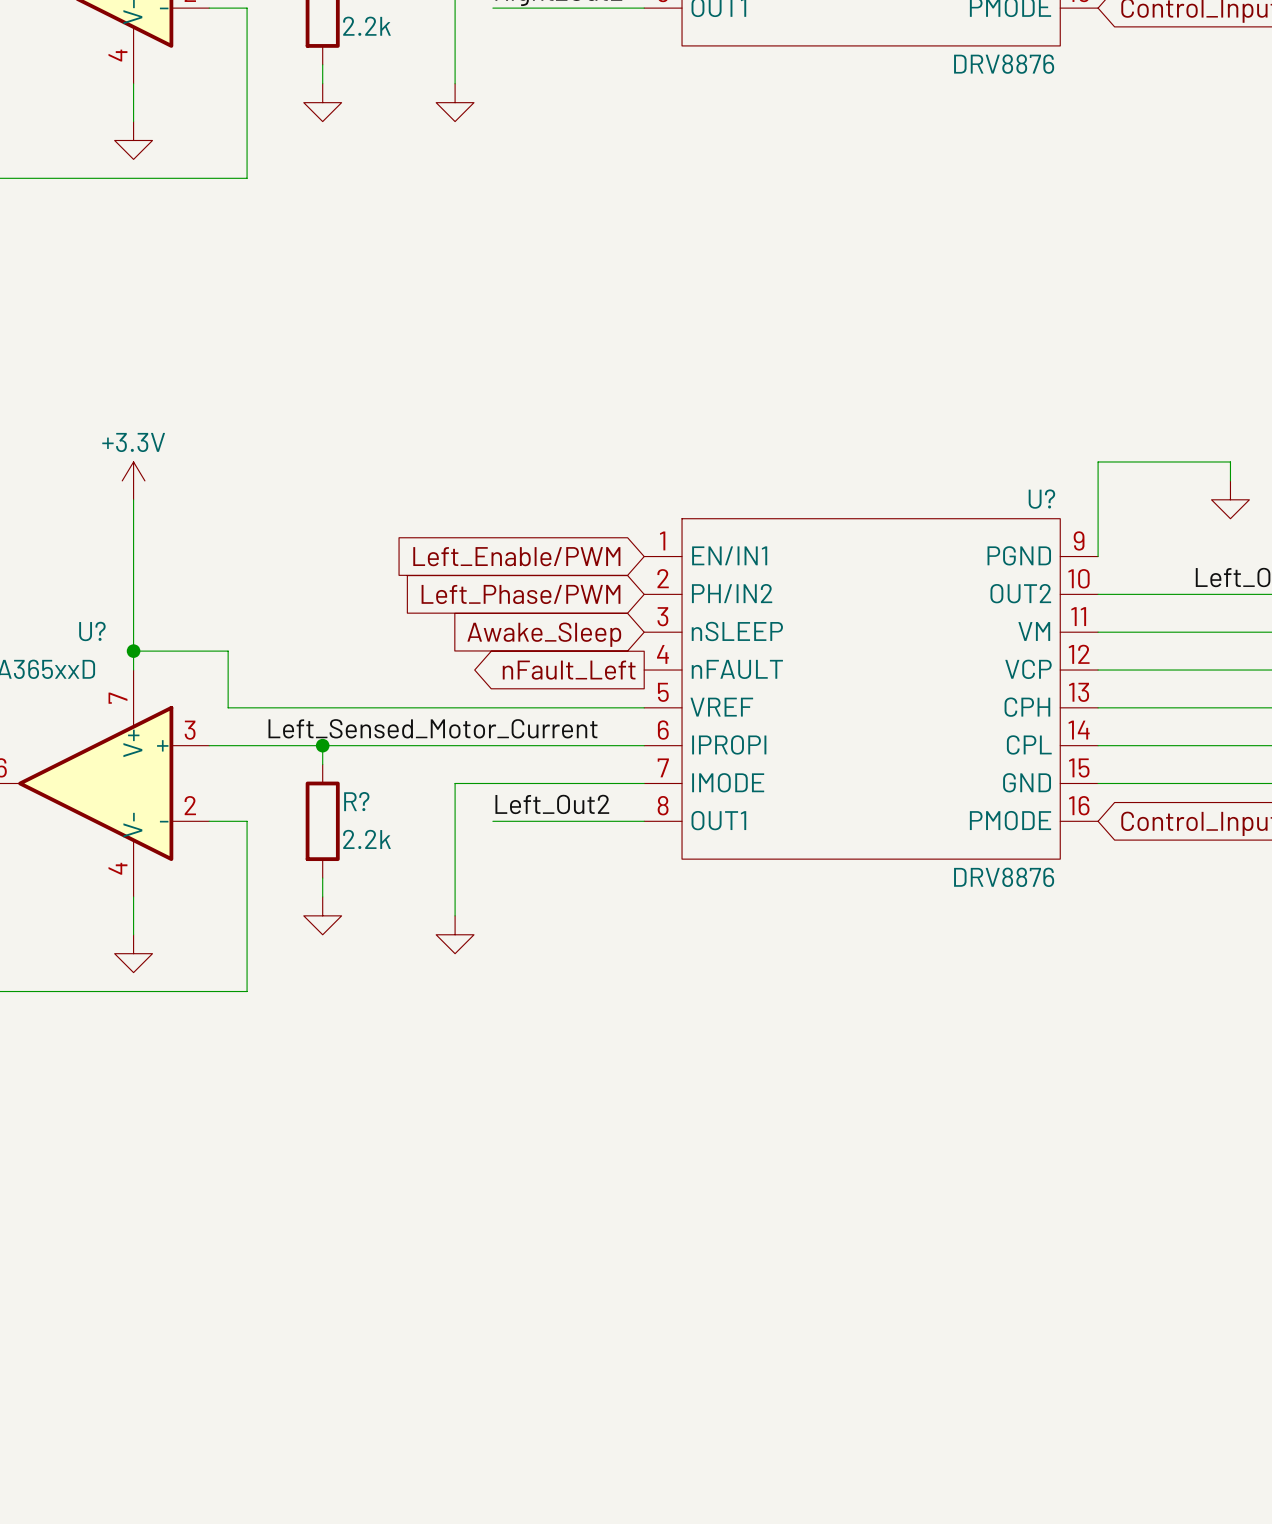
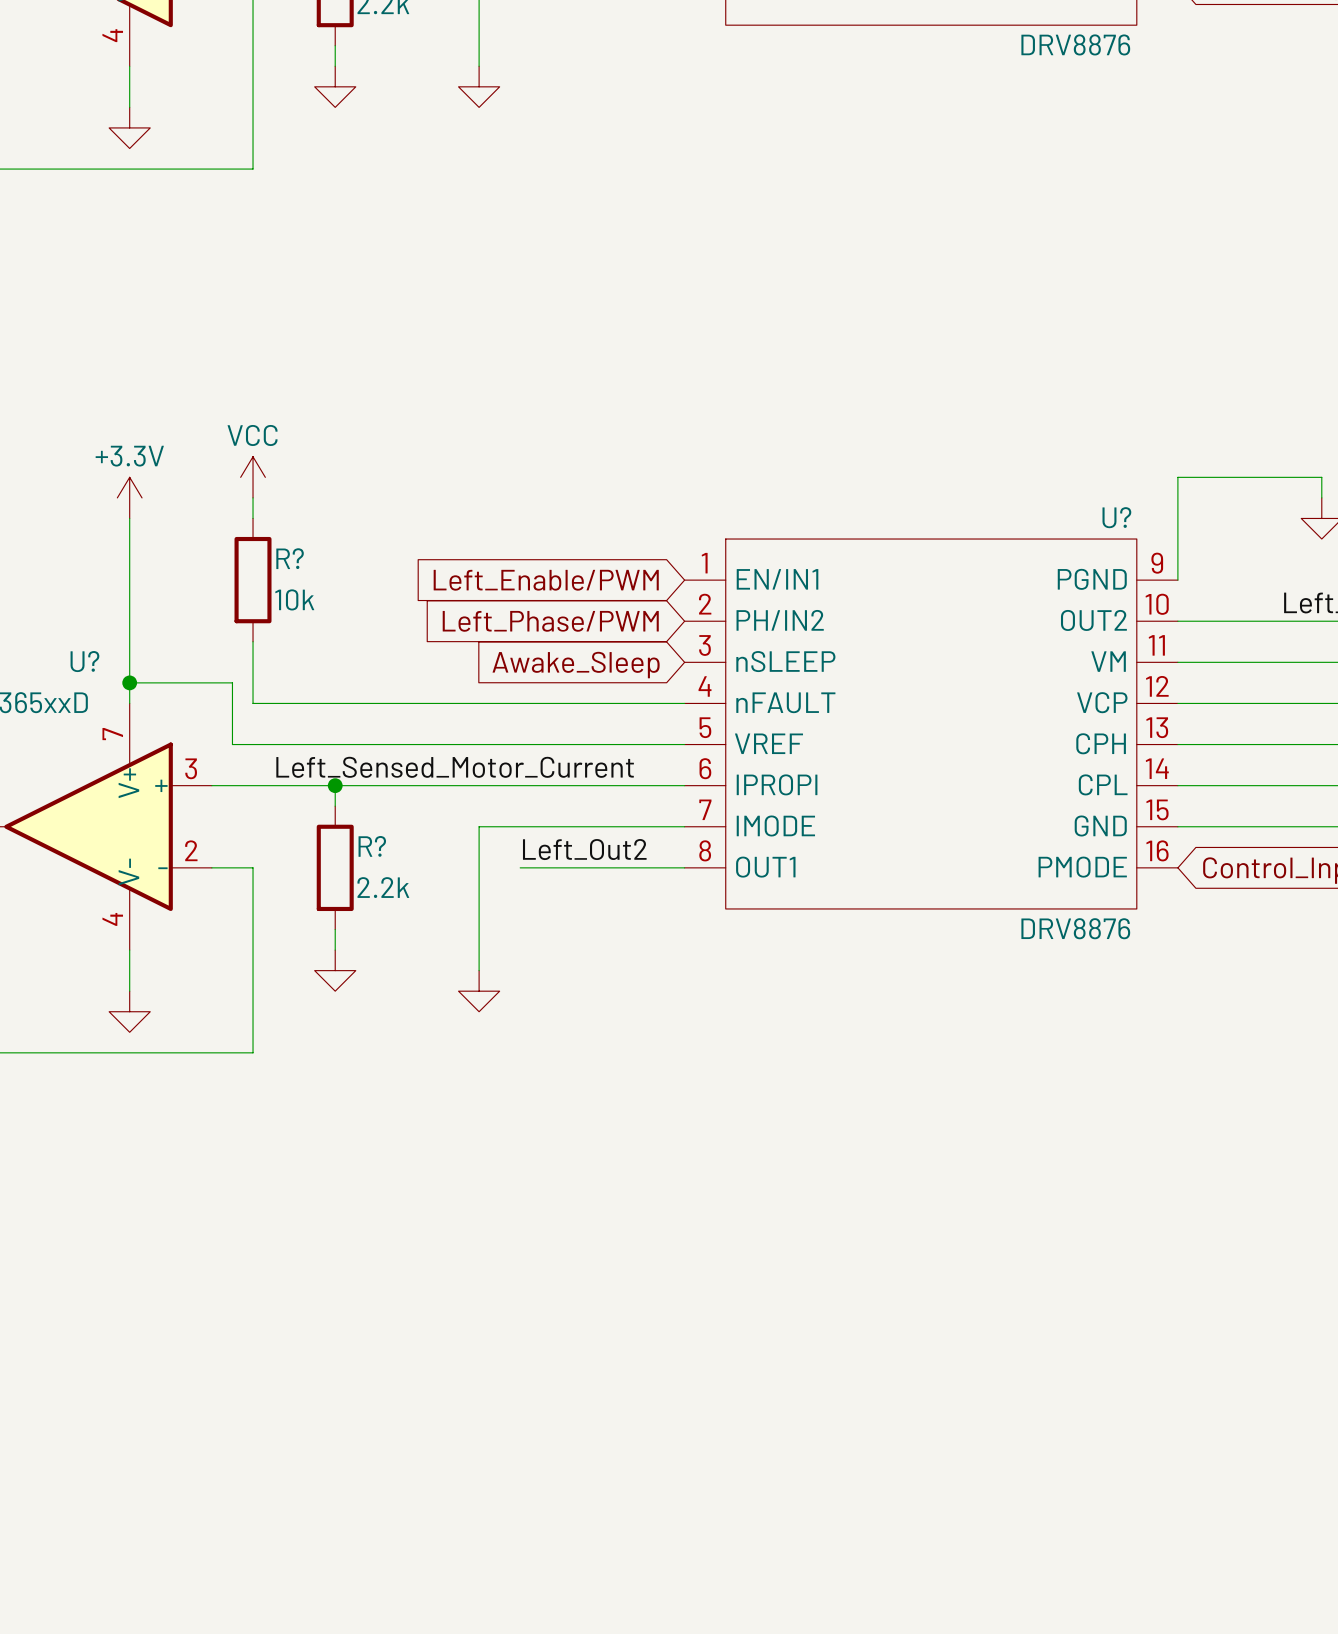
power symbol: none -> VCC (253, 477)
wire: none -> (253, 497) (253, 518)
R?: none -> 10k (253, 580)
wire: none -> (253, 641) (253, 703) (684, 703)
global label: nFault_Left (569, 670) -> none

